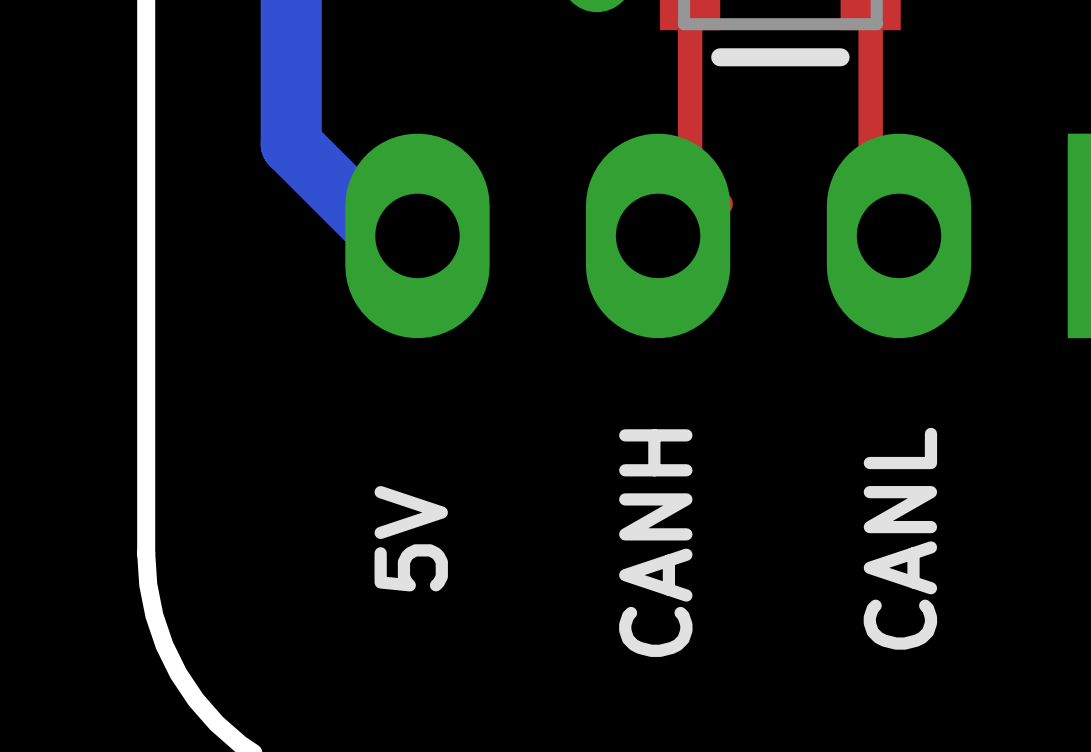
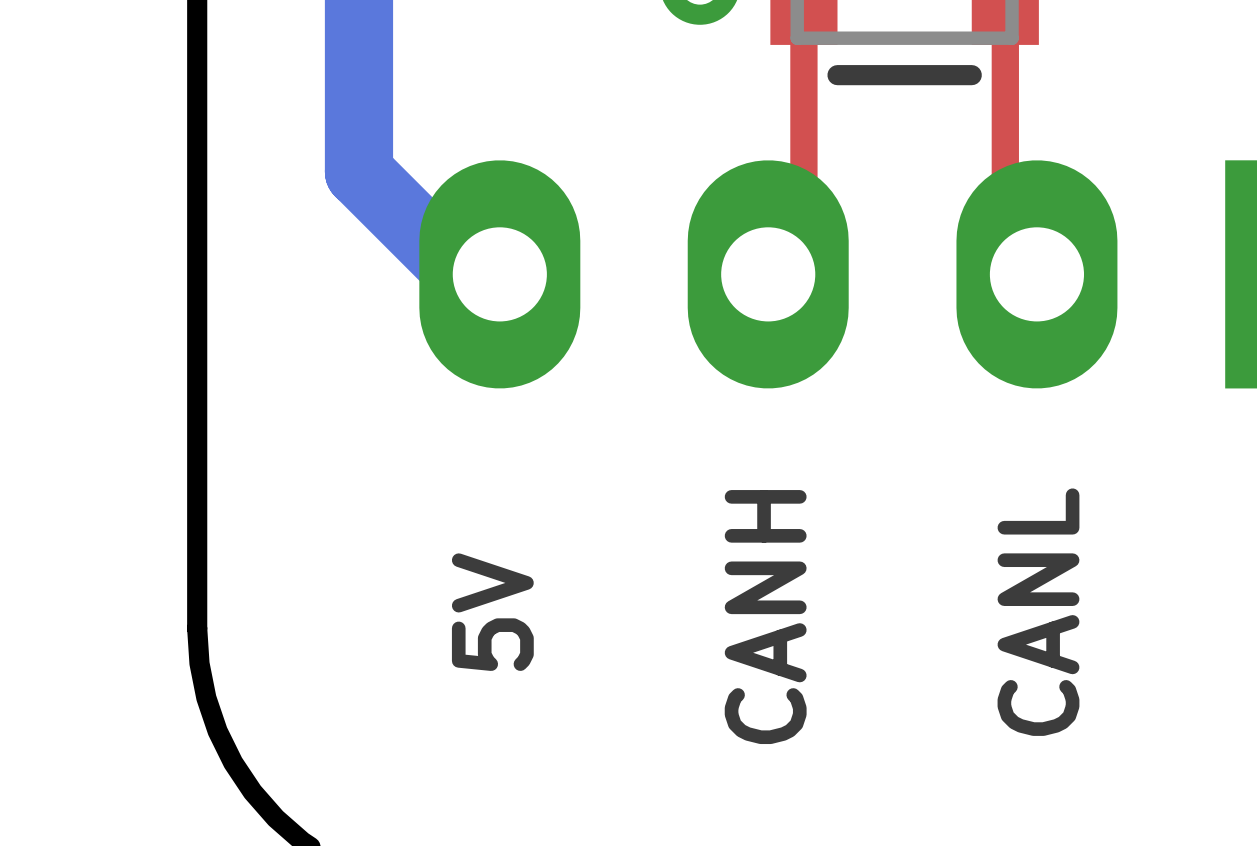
top track: (720, 203) (688, 235) -> none

